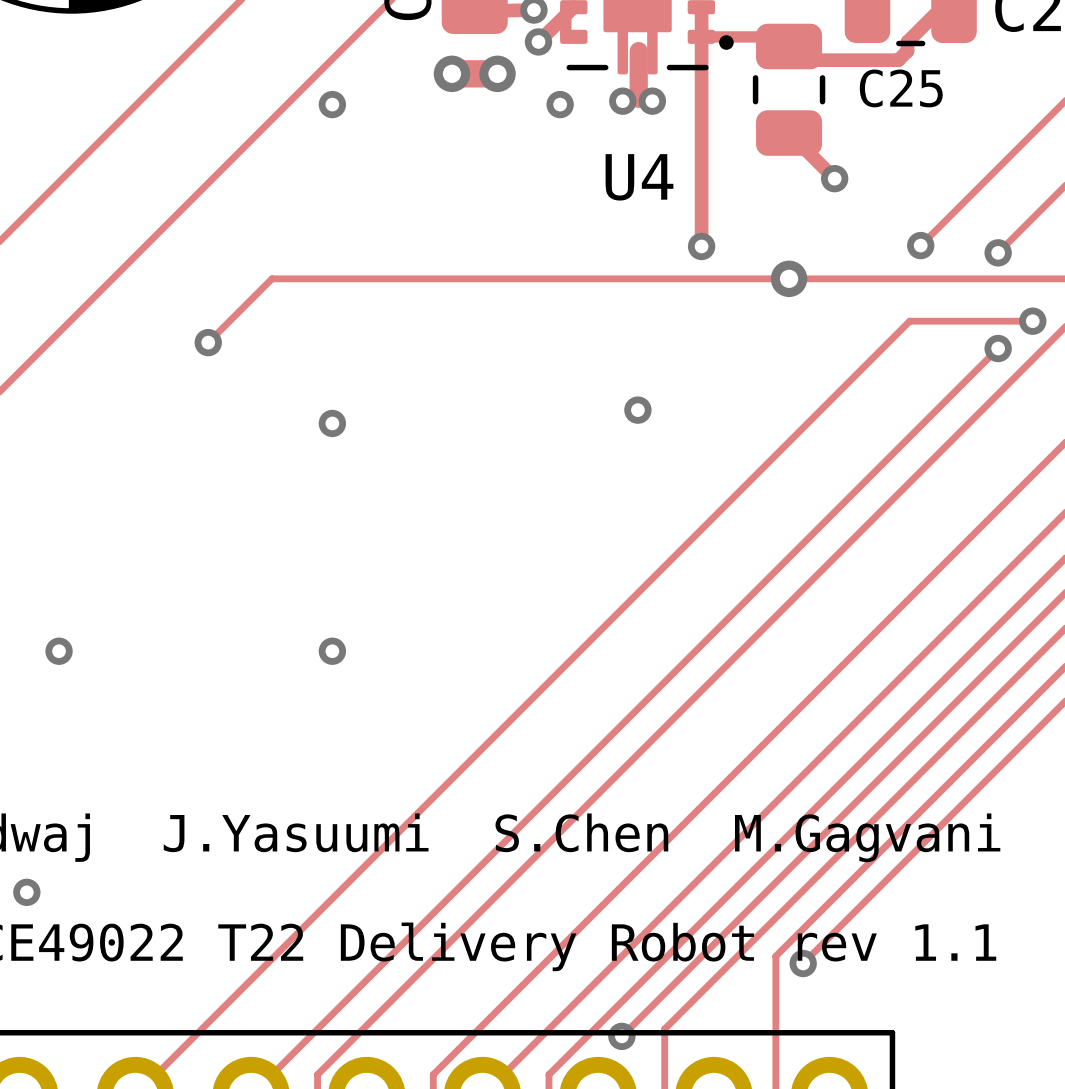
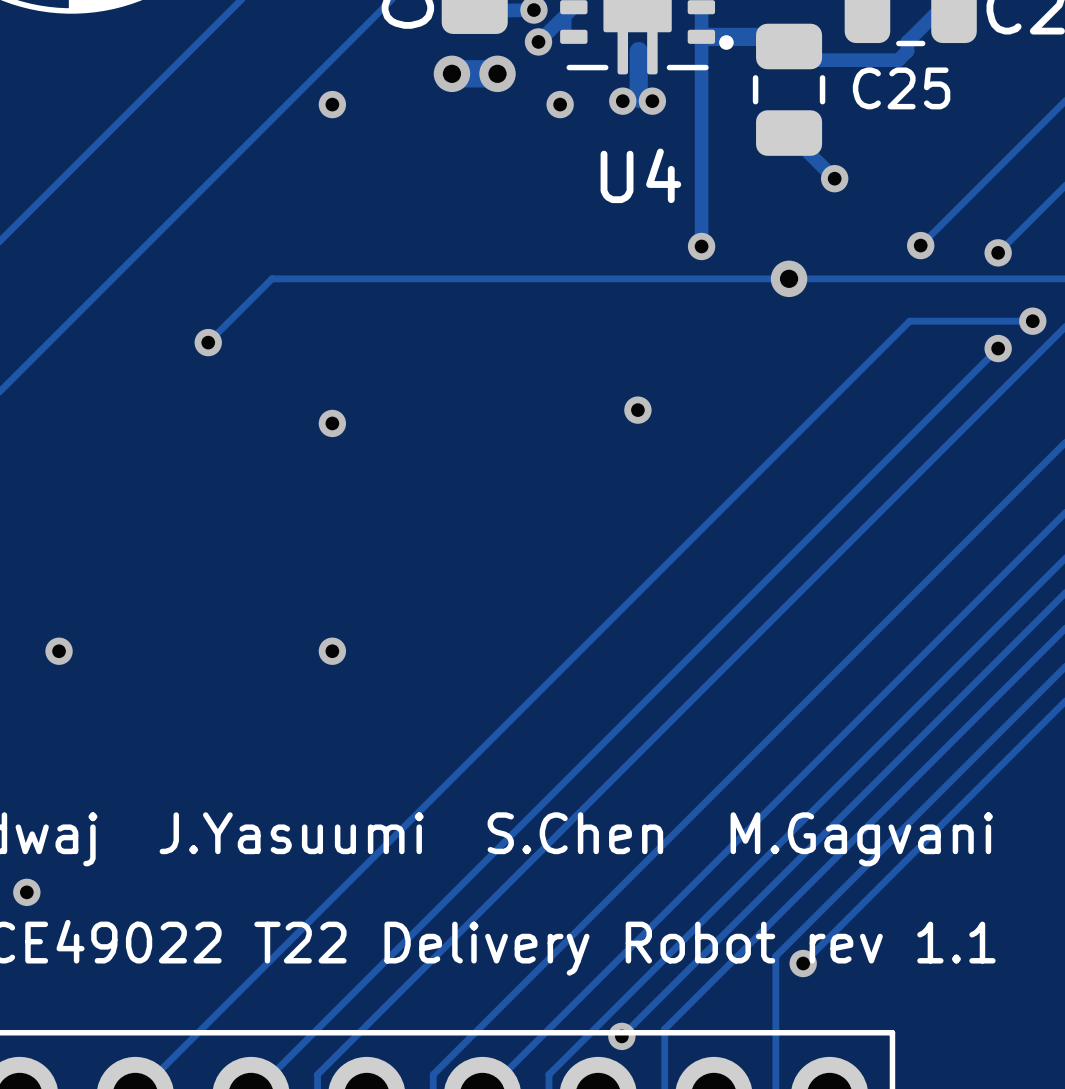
track width: thin (701, 36) (770, 36) -> thick (701, 36) (770, 36)

